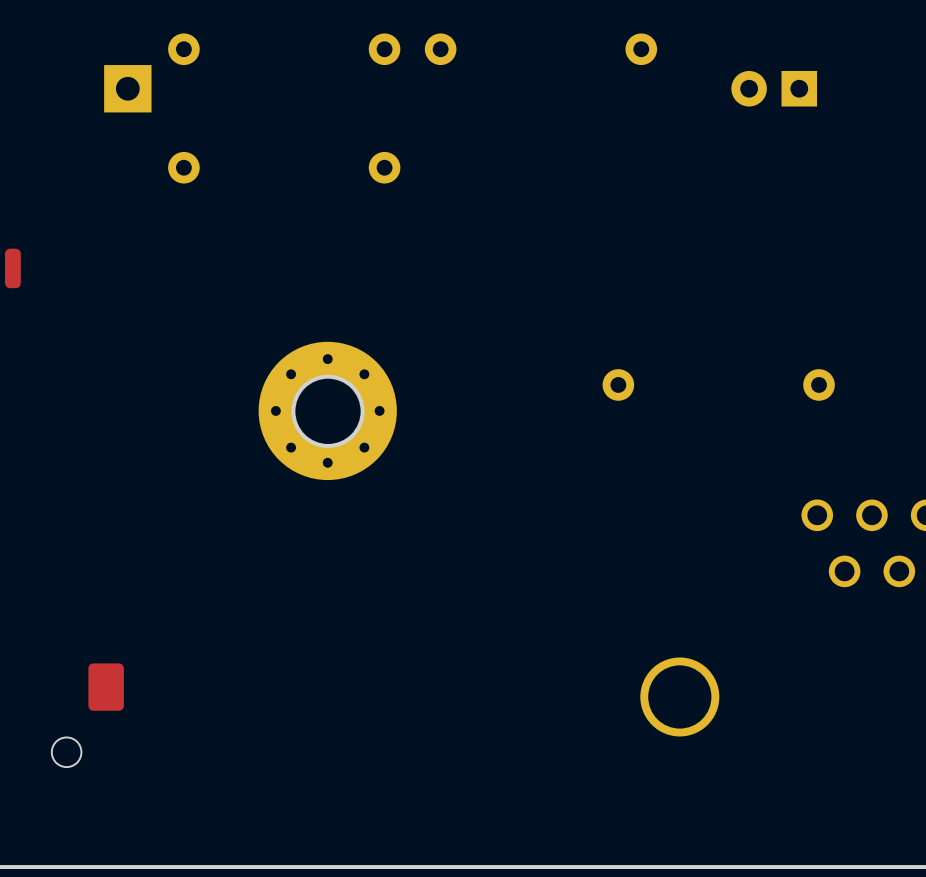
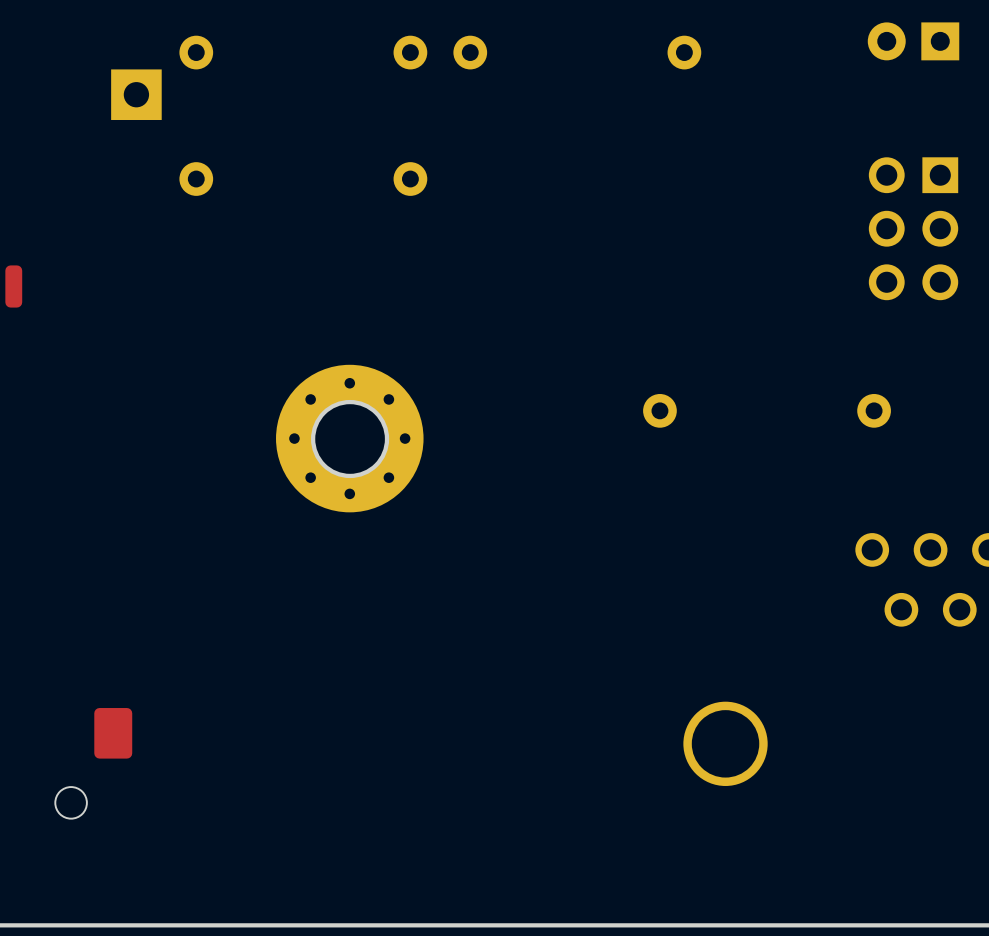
part position: (774, 88) -> (913, 41)
part: none -> (913, 228)

